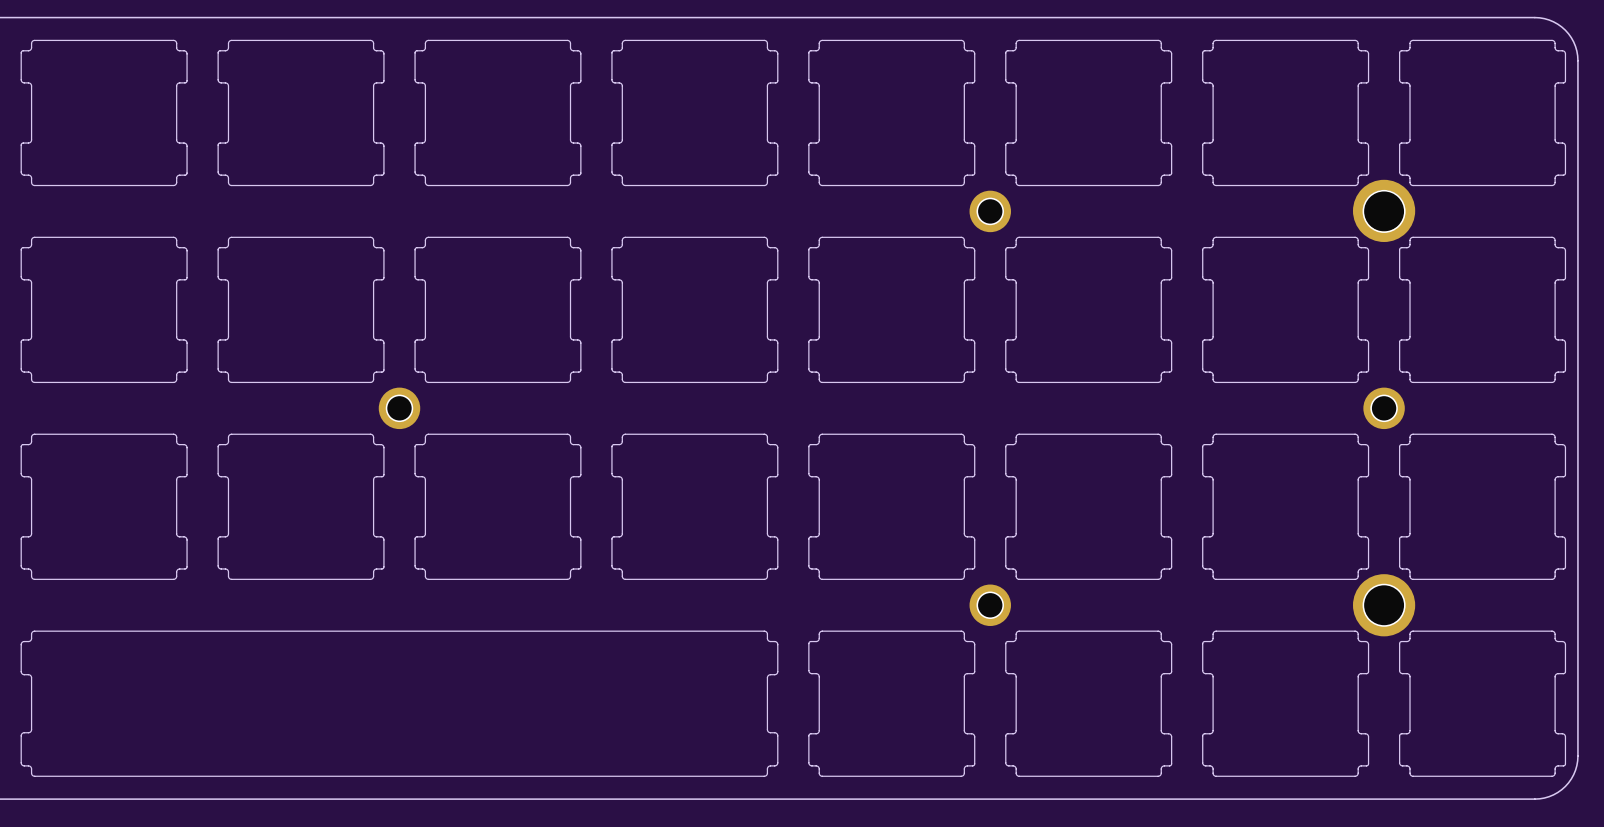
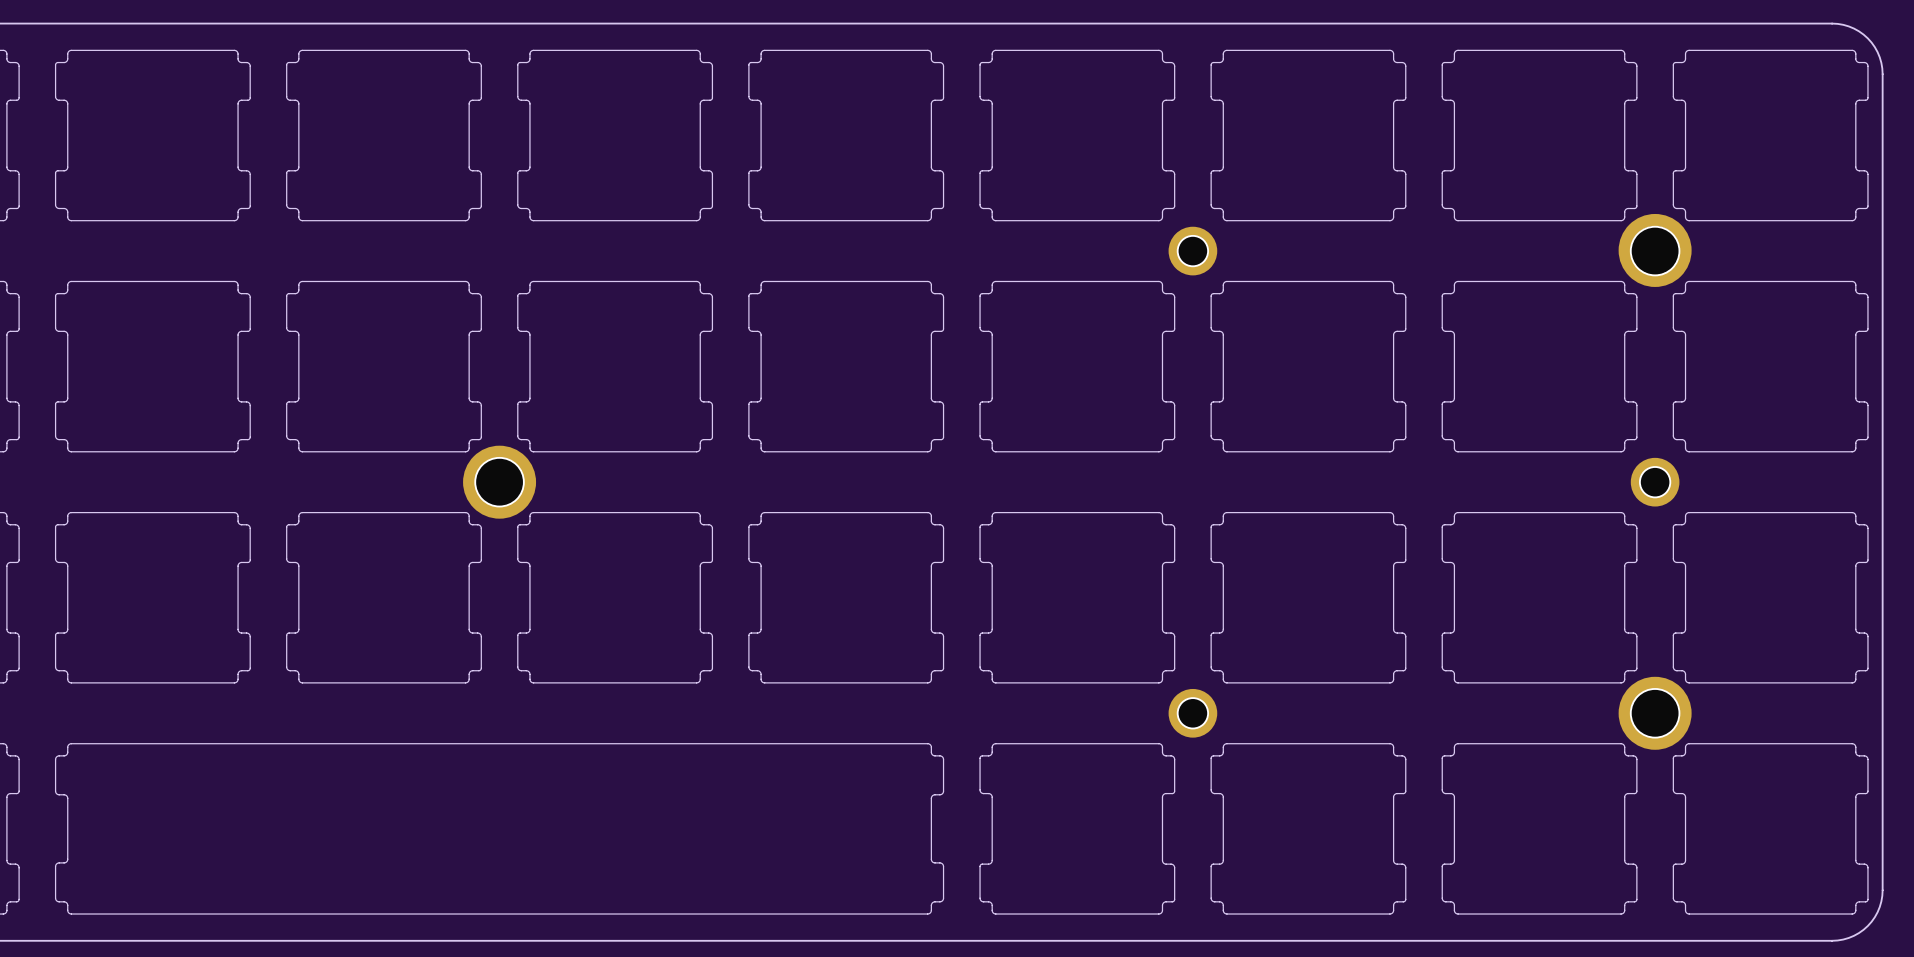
via size: [378, 387, 421, 430] -> [463, 445, 537, 519]
drawing shape: [385, 394, 414, 423] -> [474, 456, 525, 508]

